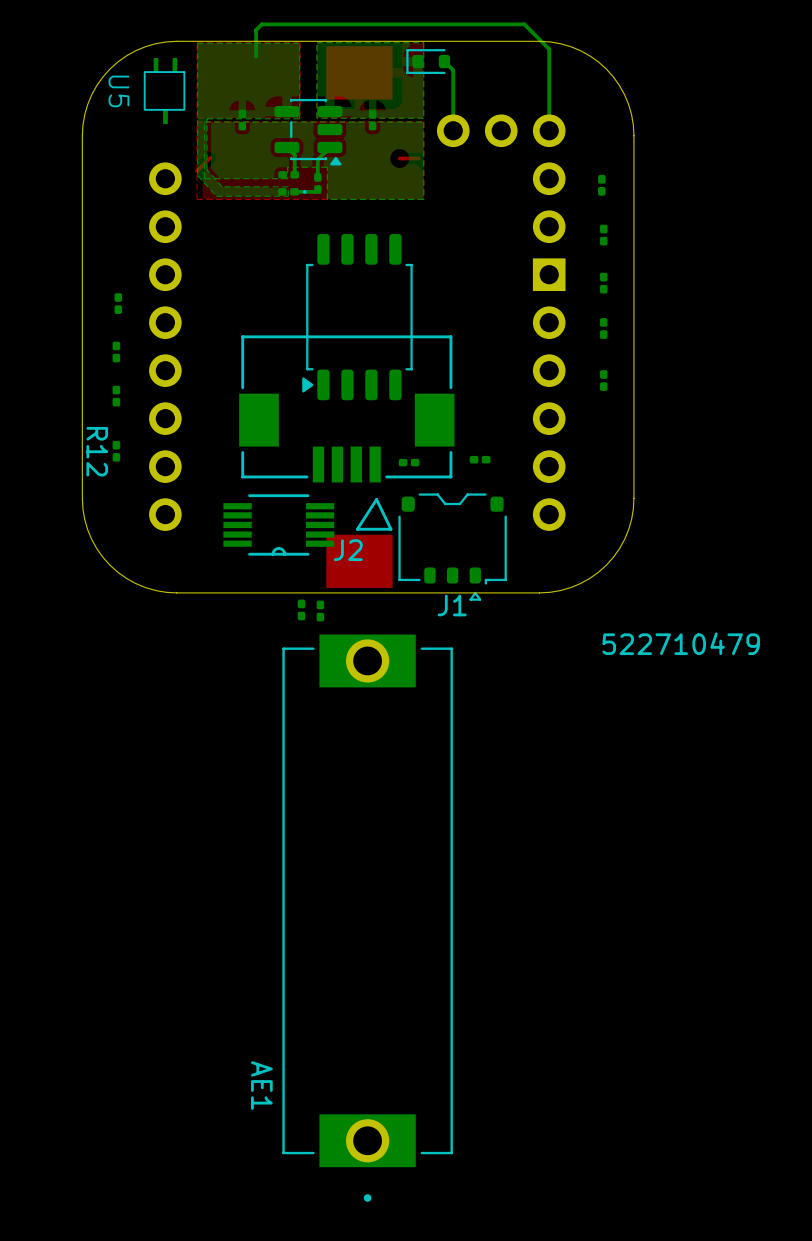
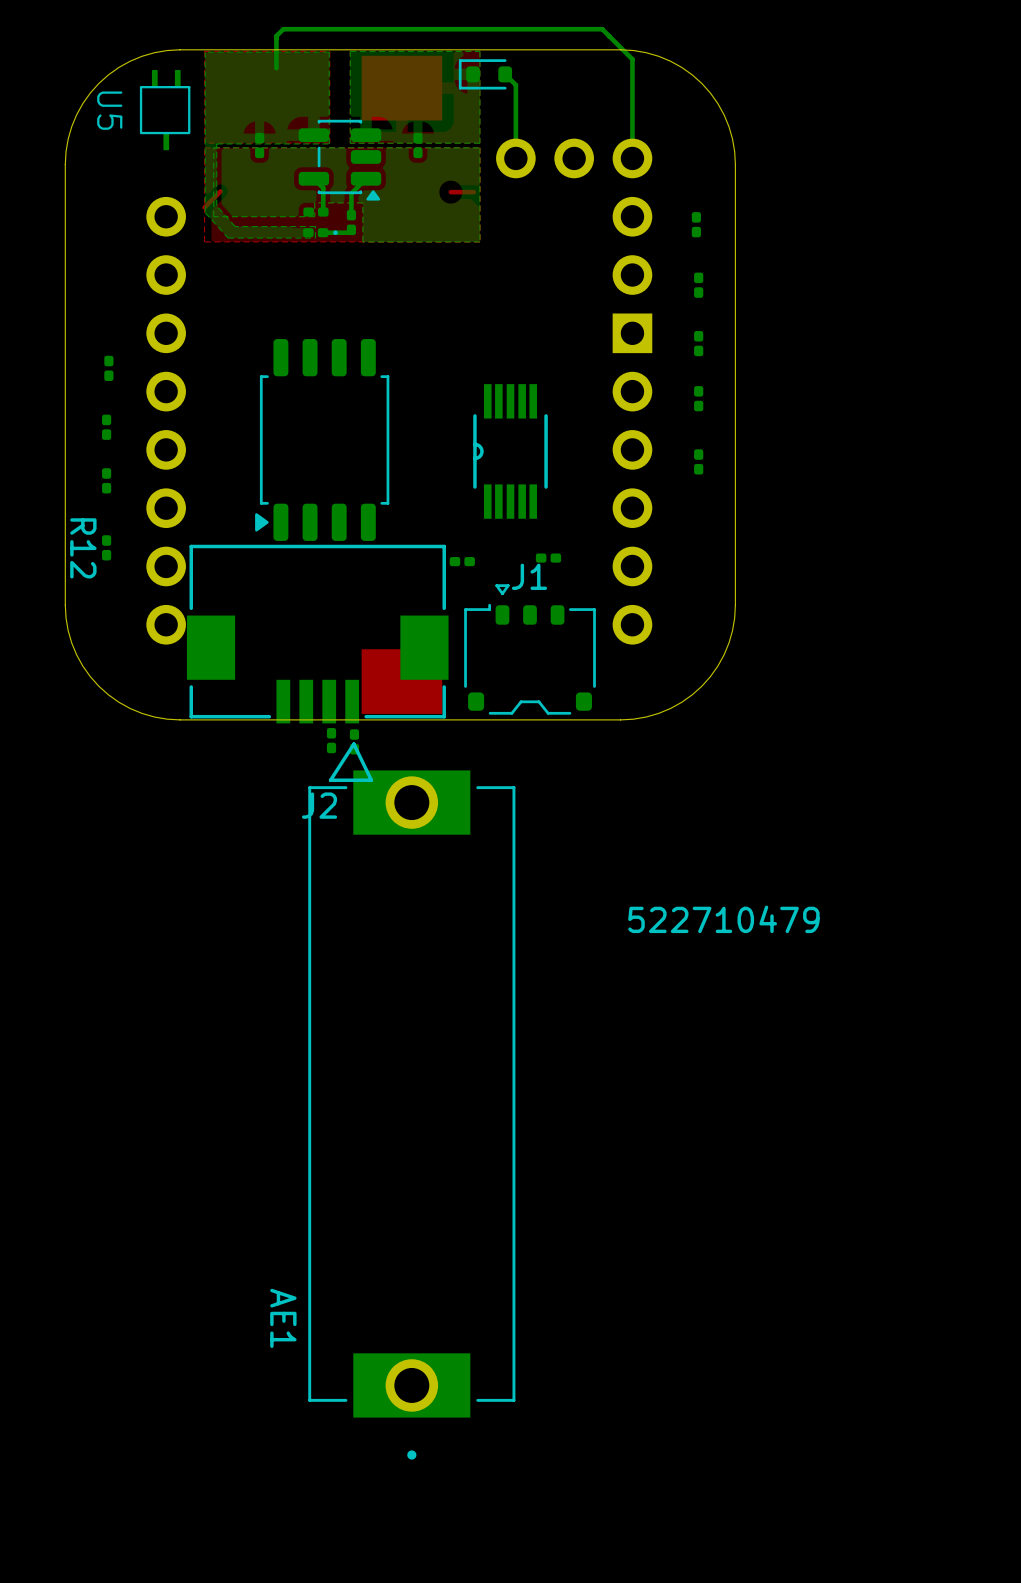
part position: (357, 317) -> (322, 439)
J2 position: (346, 433) -> (317, 663)
part rotation: 0° (278, 524) -> 90° clockwise (510, 451)
part position: (278, 524) -> (510, 451)
J1 rotation: 0° (452, 547) -> 180° (530, 649)

